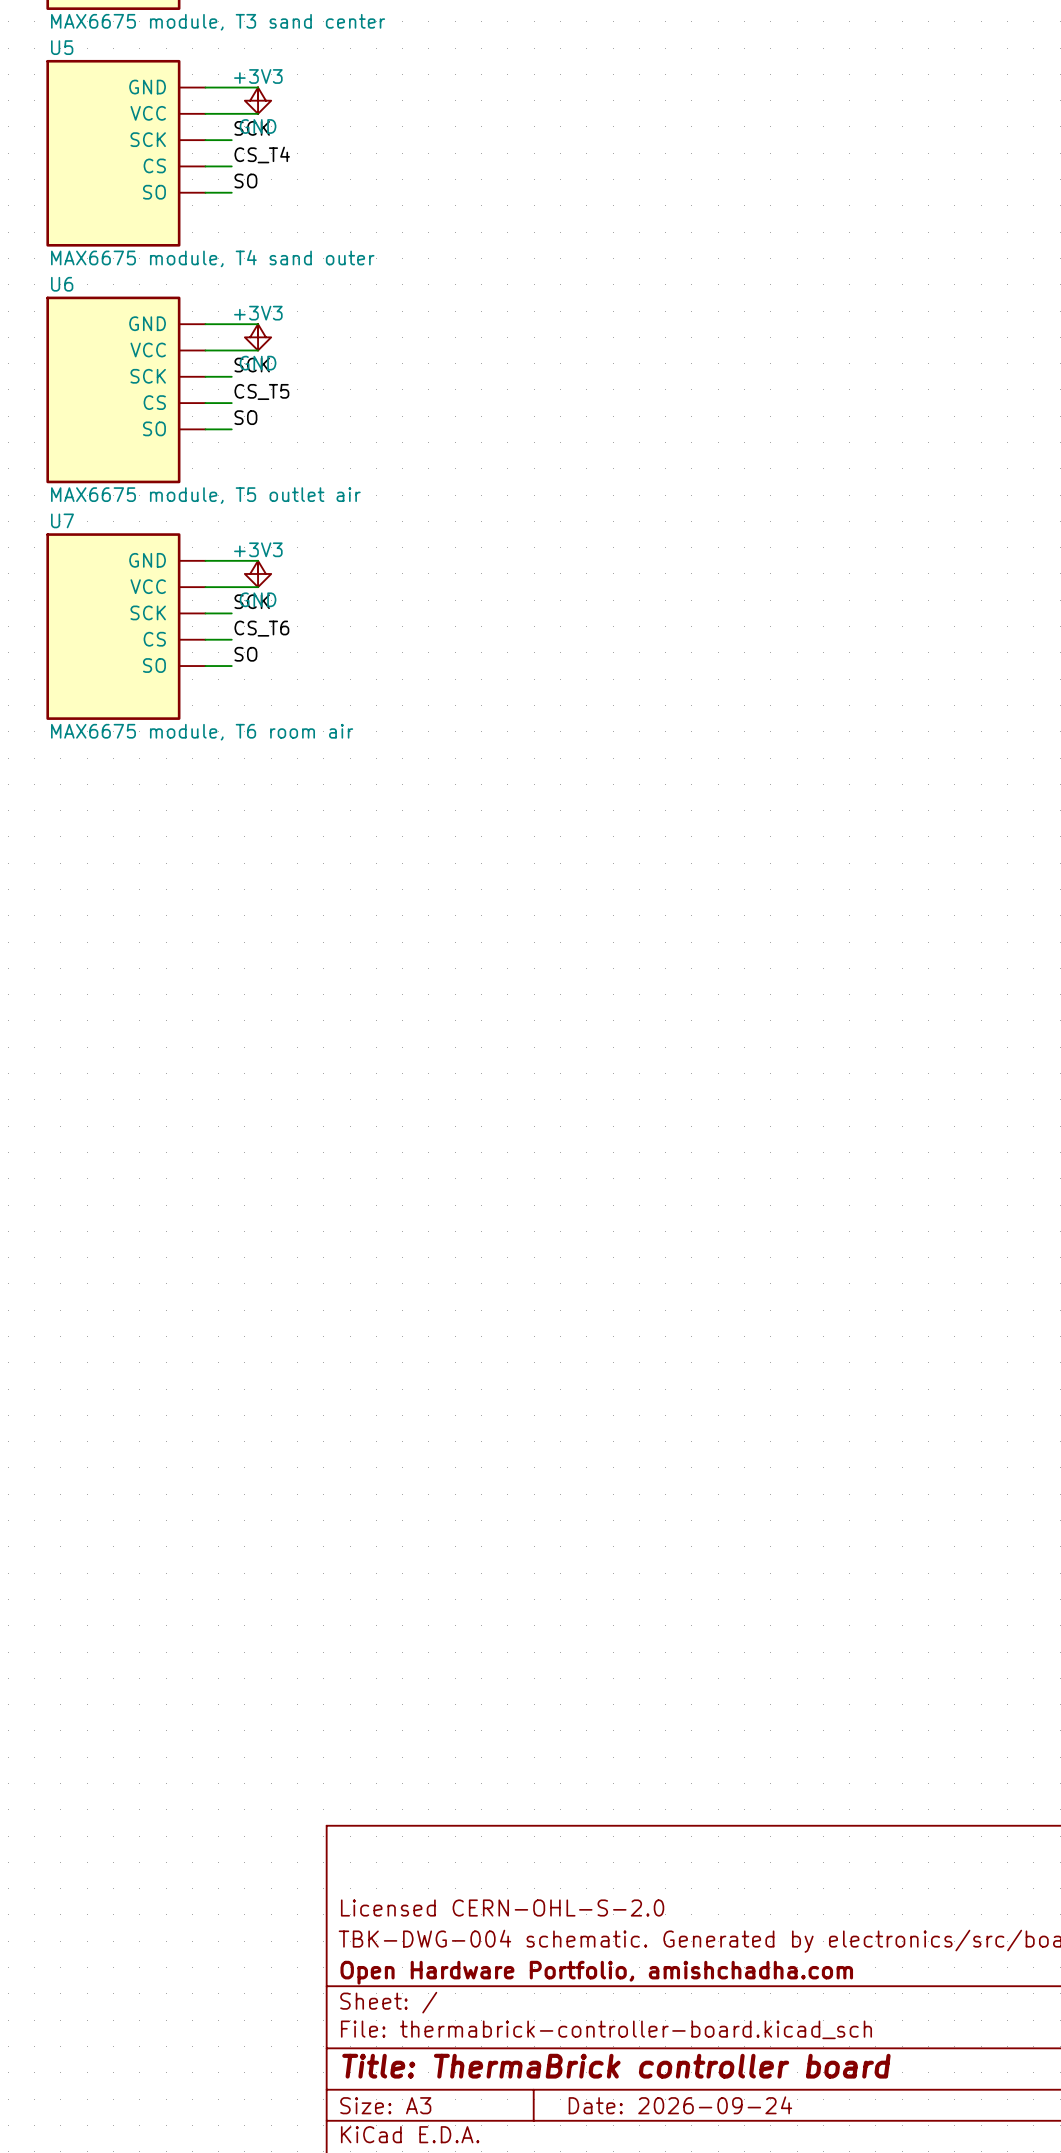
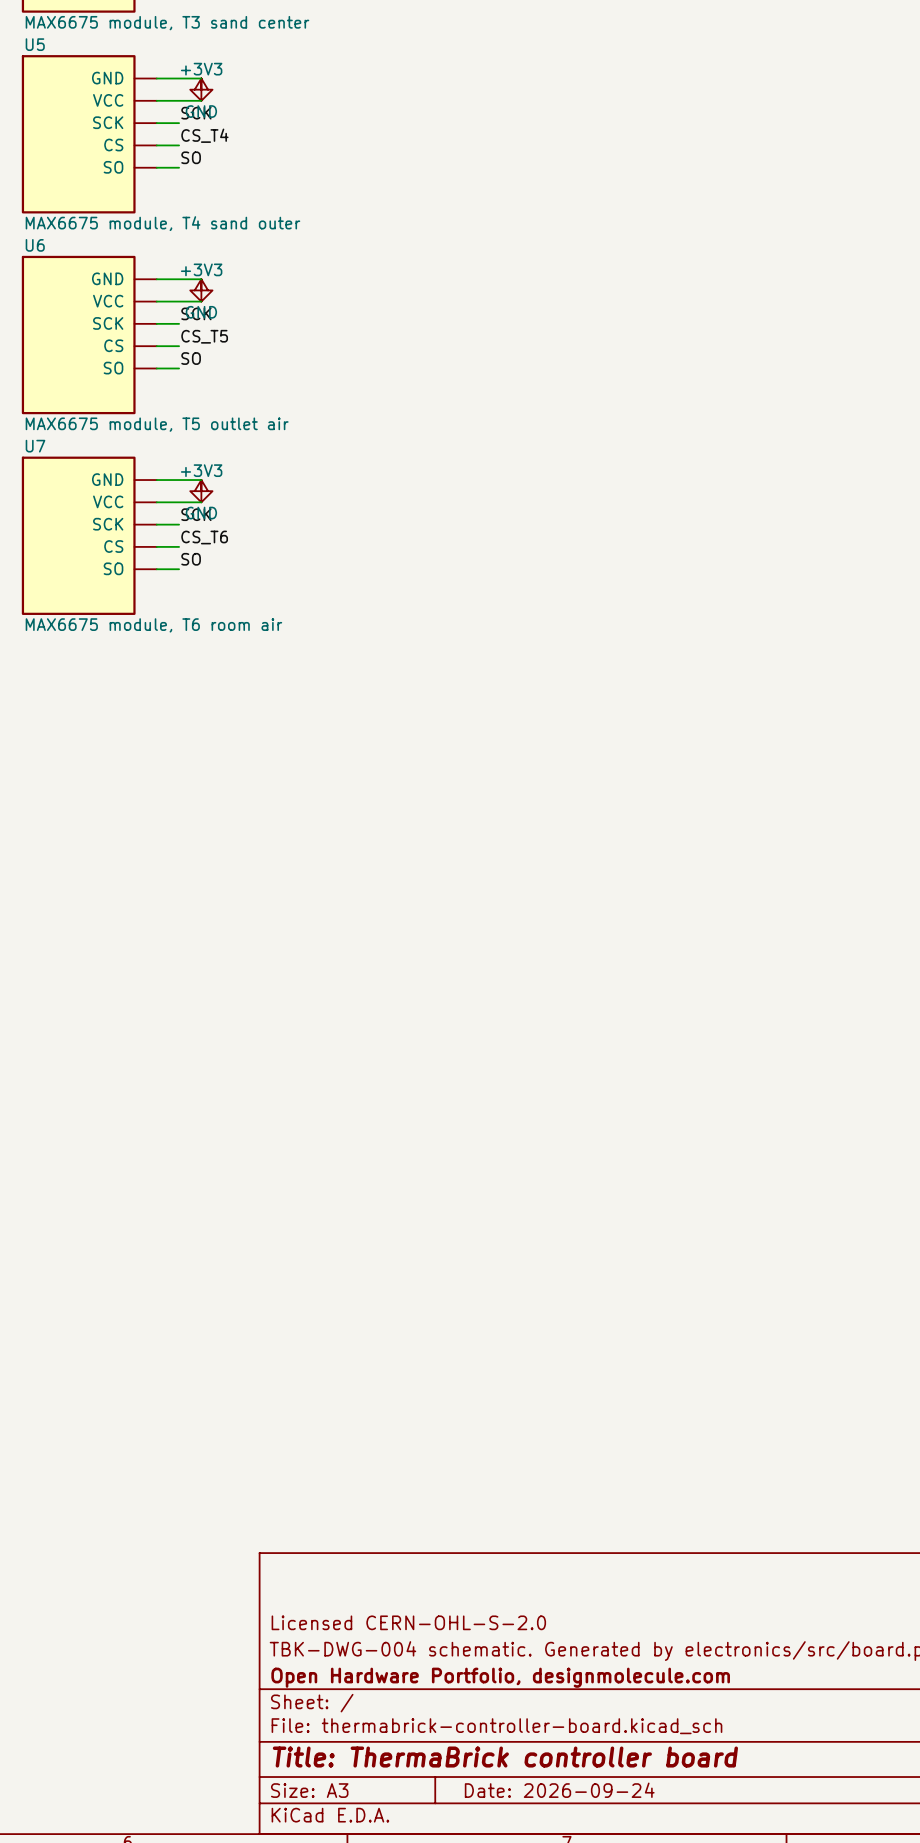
title block: Open Hardware Portfolio, amishchadha.com (596, 1972) -> Open Hardware Portfolio, designmolecule.com (500, 1677)

